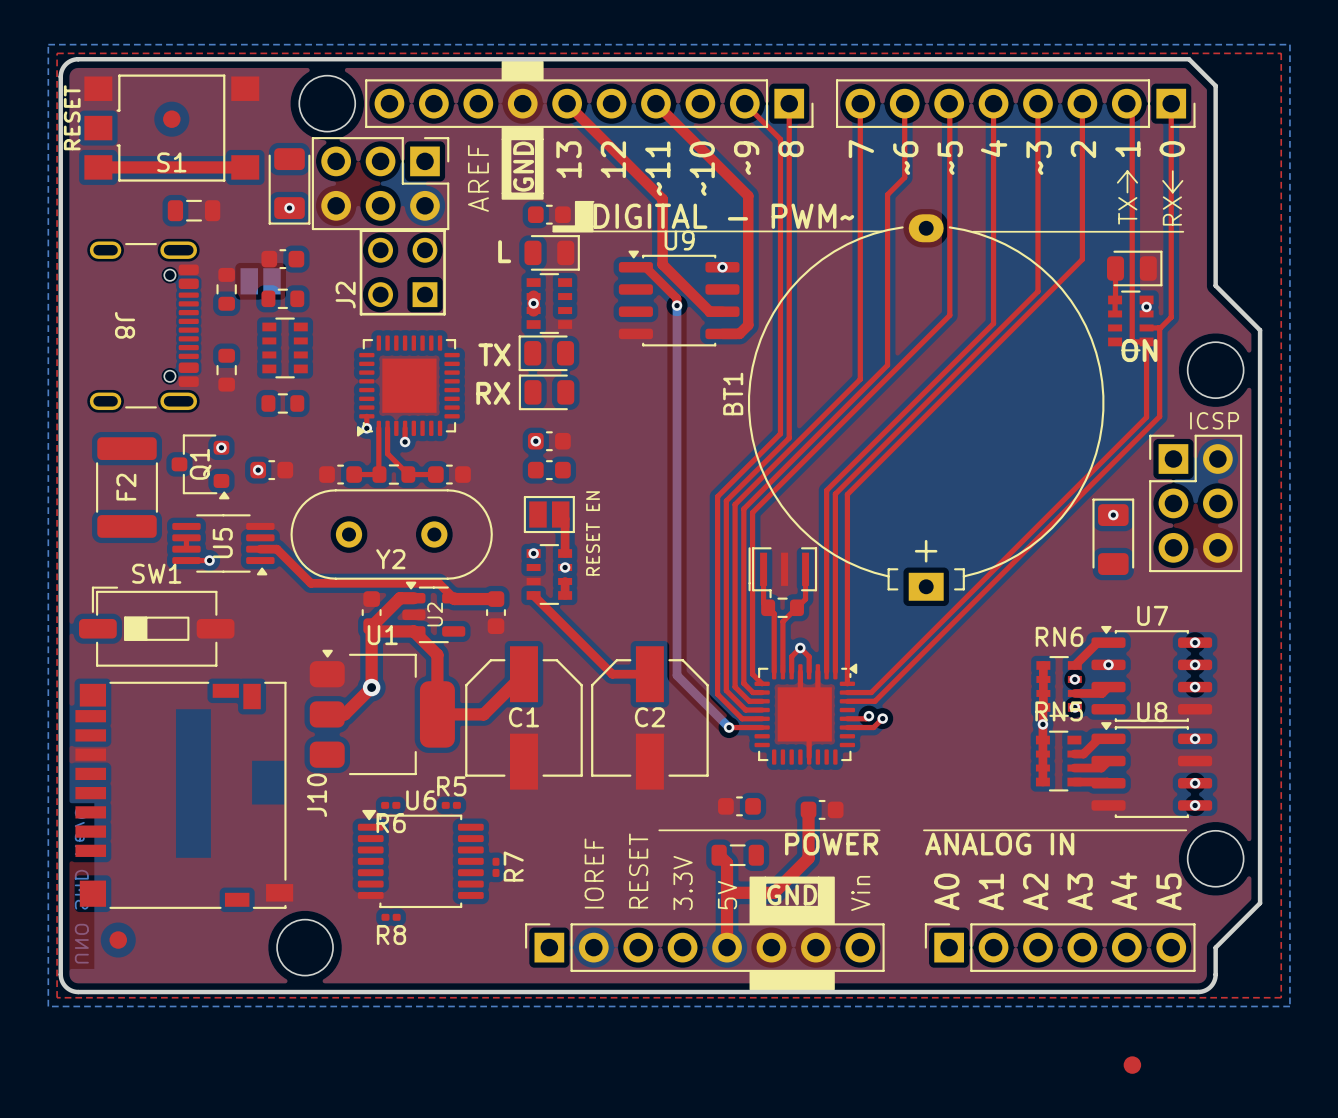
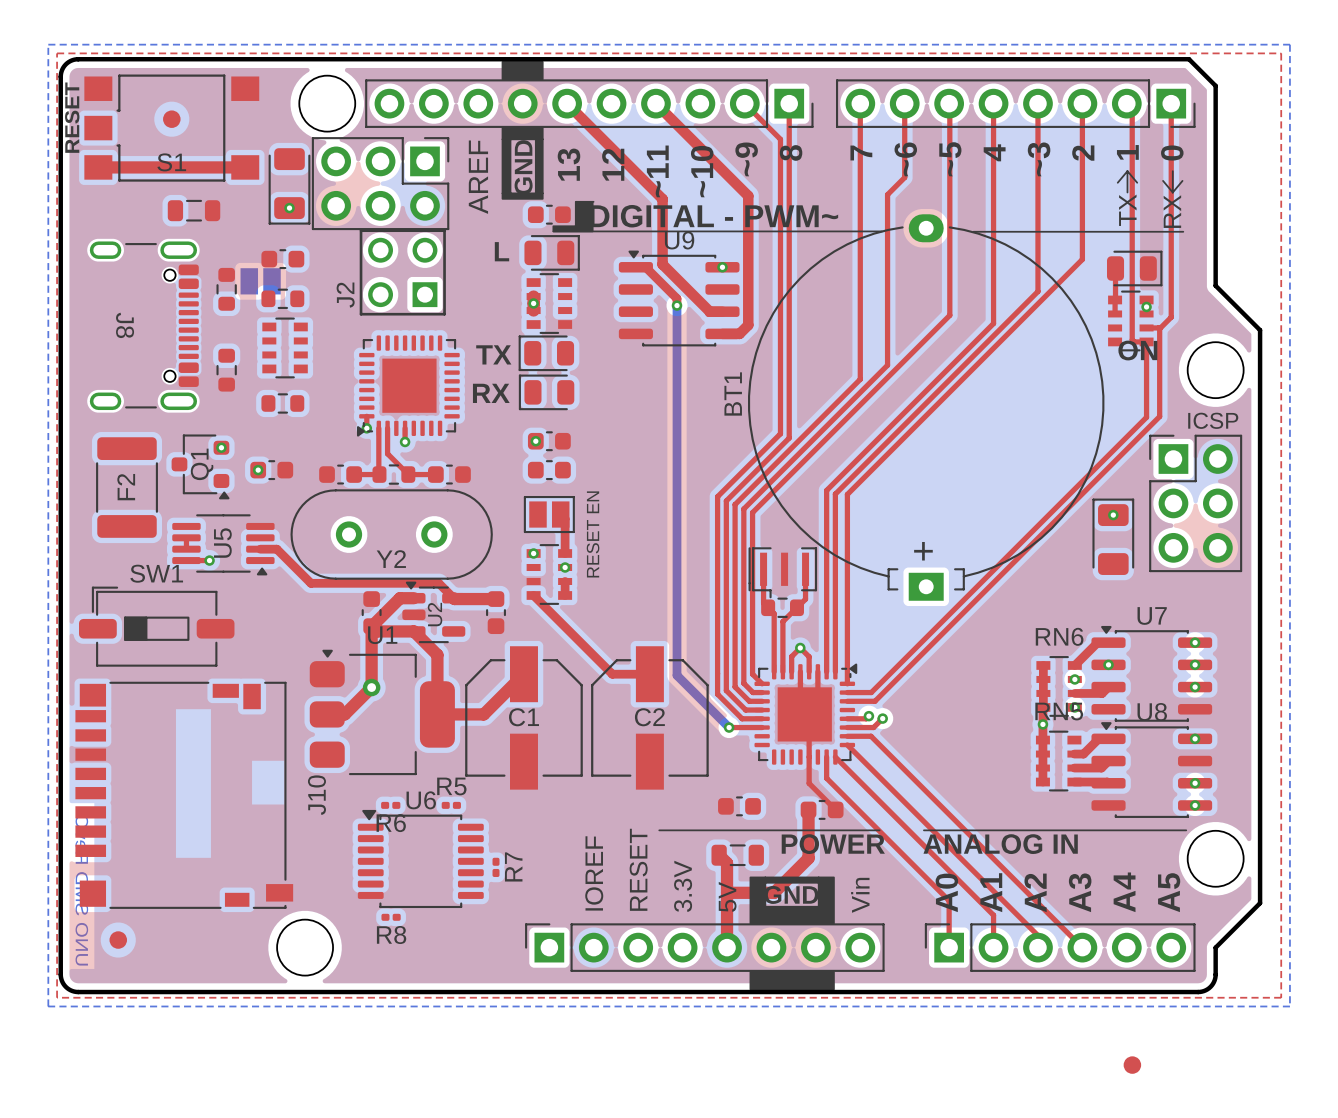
top track: none -> (847, 736) (871, 736) (1082, 947)
top track: none -> (847, 745) (1037, 935) (1037, 947)
top track: none -> (809, 757) (809, 783) (835, 809)
top track: none -> (826, 757) (826, 778) (949, 900) (949, 947)
top track: none -> (835, 757) (993, 915) (993, 947)

